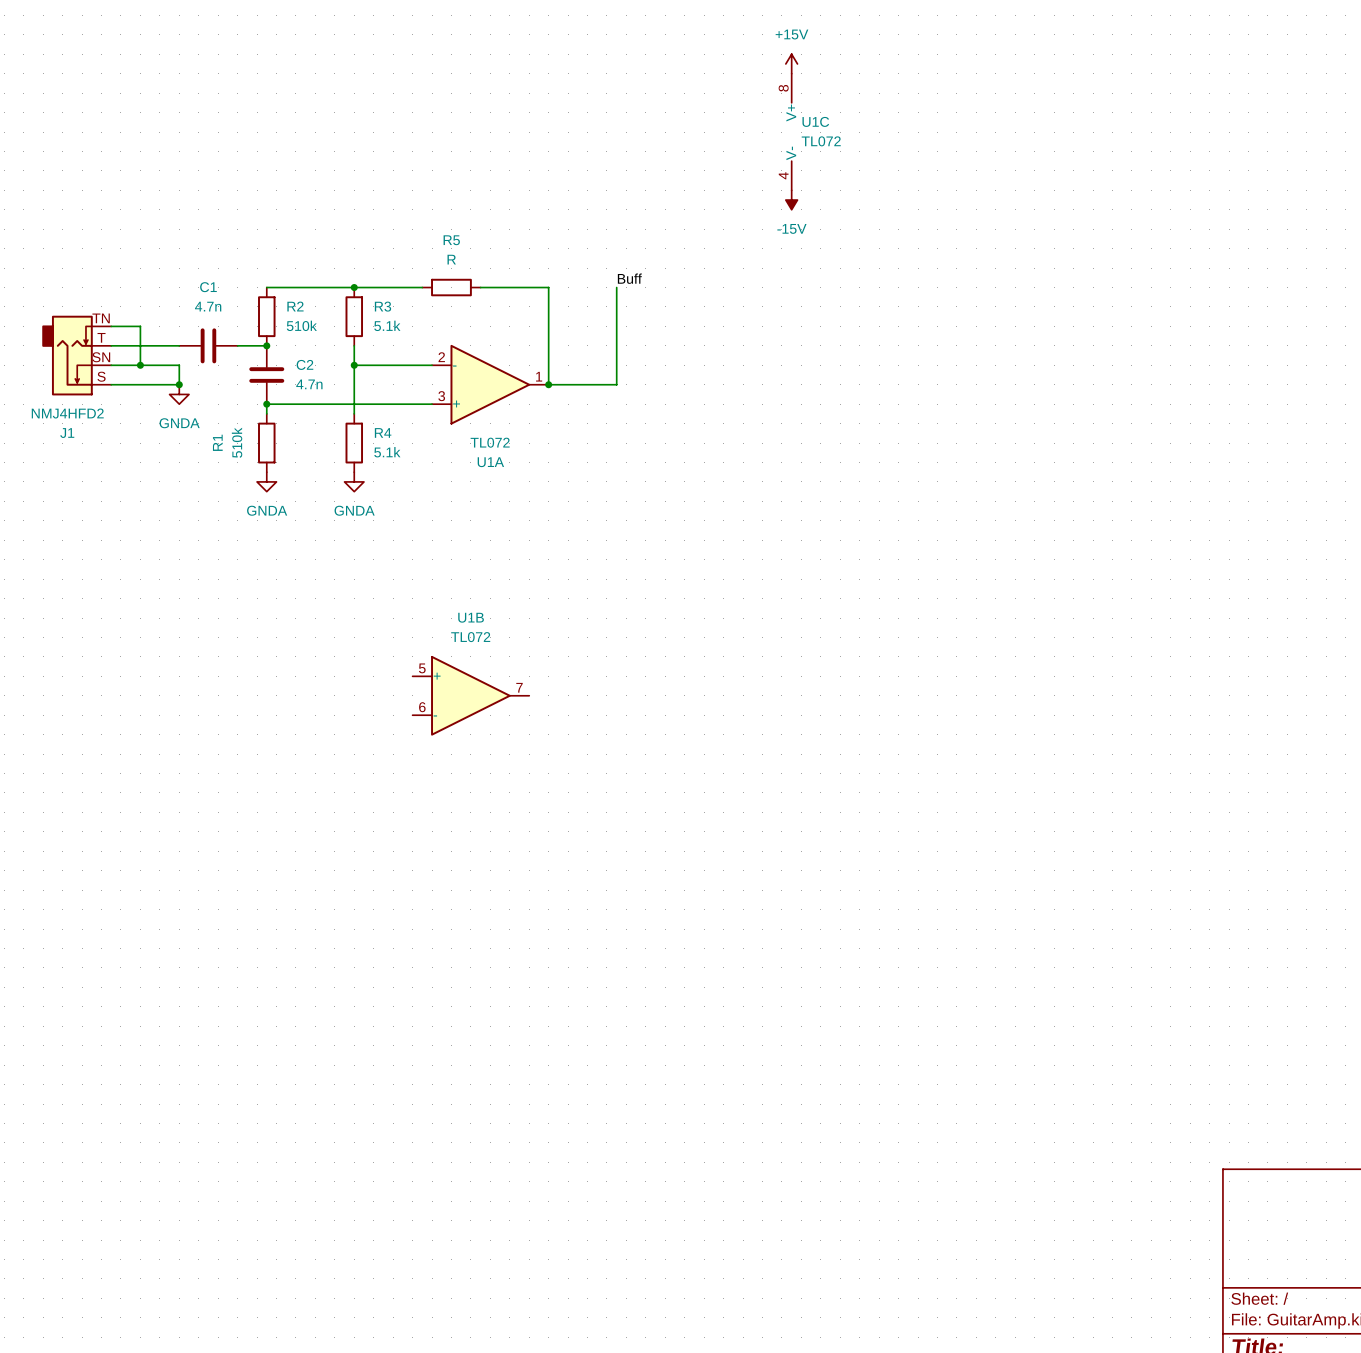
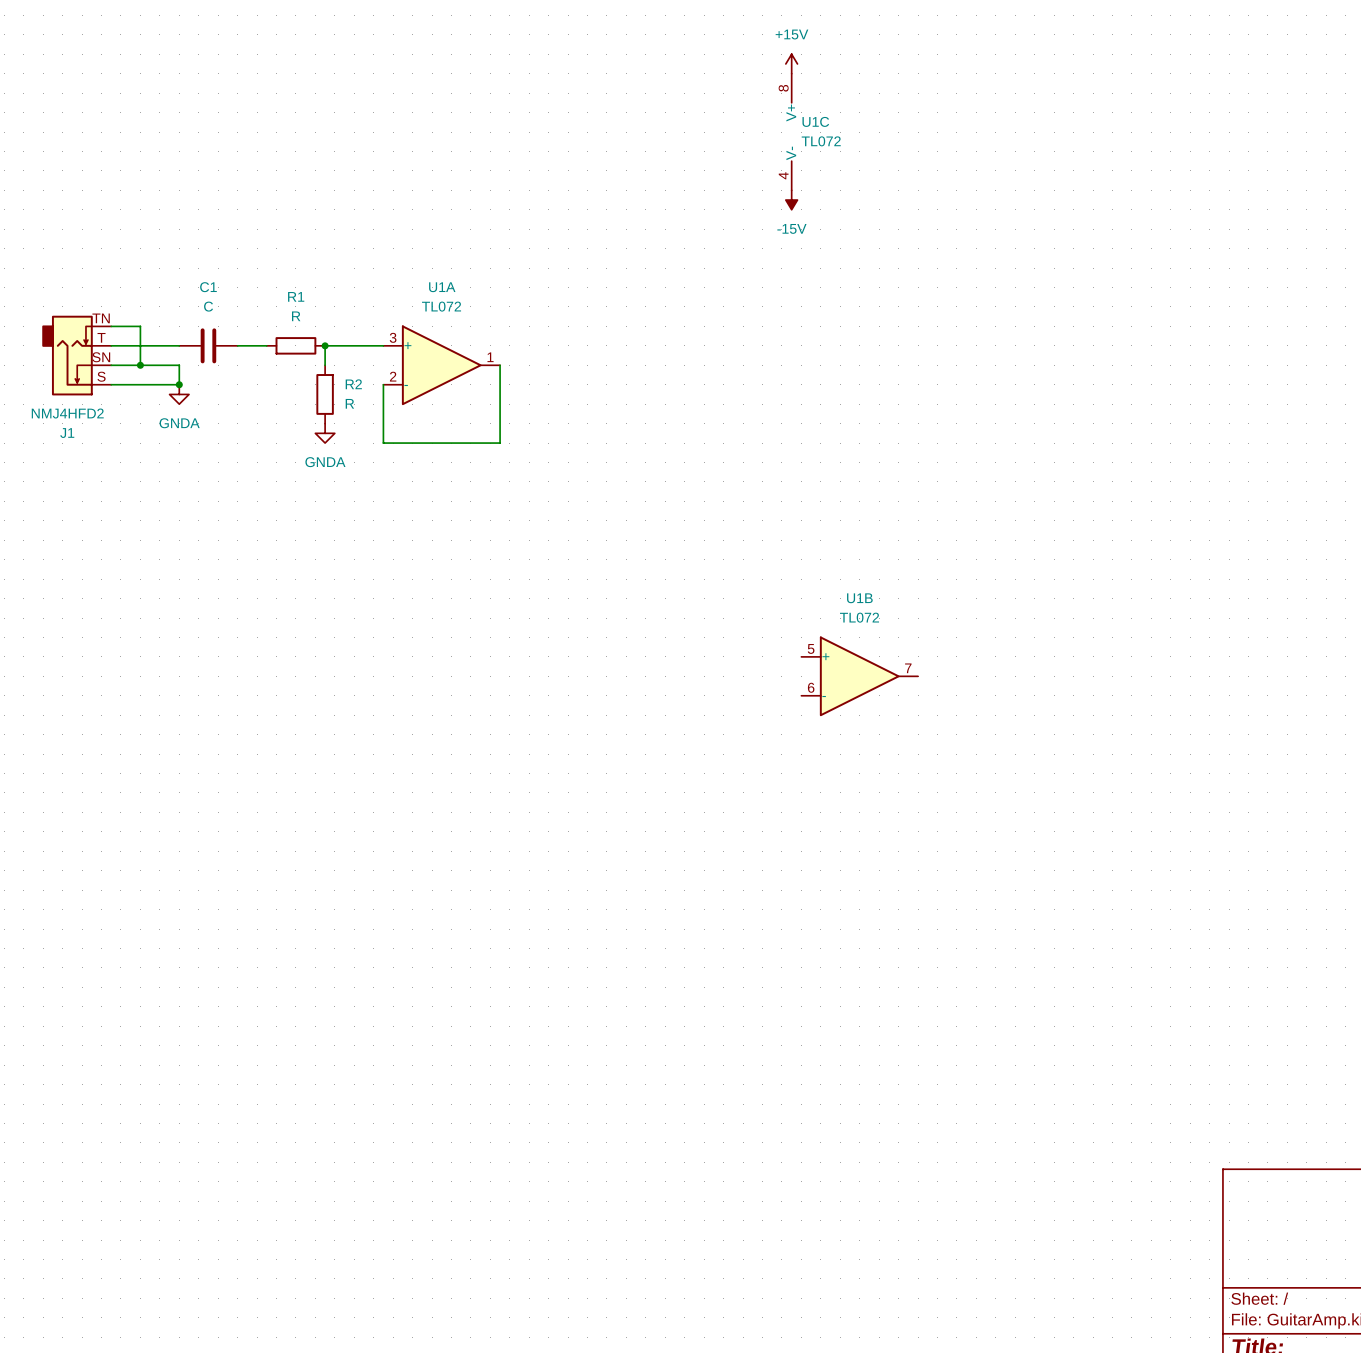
label: Buff (629, 278) -> none
wire: (266, 287) (422, 287) -> none
junction: (354, 287) -> none
R5: R (451, 287) -> none
wire: (480, 287) (548, 287) (548, 384) (616, 384) (616, 287) -> none
C1 value: 4.7n (208, 306) -> C (208, 306)
R2 position: (266, 316) -> (325, 394)
R3: 5.1k (354, 316) -> none
R2 value: 510k (301, 325) -> R (349, 403)
junction: (266, 345) -> none
junction: none -> (325, 345)
wire: (354, 345) (354, 413) -> none
wire: none -> (383, 345) (325, 345) (325, 365)
wire: (354, 365) (432, 365) -> none
junction: (354, 365) -> none
wire: none -> (500, 365) (500, 443) (383, 443) (383, 384)
C2: 4.7n (266, 375) -> none
U1A flip: as is (490, 384) -> up-down (441, 365)
junction: (548, 384) -> none
junction: (266, 404) -> none
wire: (432, 404) (266, 404) (266, 413) -> none
power symbol: none -> GNDA (325, 433)
R1 value: 510k (237, 442) -> R (296, 316)
R1 rotation: 0° (266, 443) -> 90° clockwise (295, 345)
R1 position: (266, 443) -> (295, 345)
R4: 5.1k (354, 443) -> none
power symbol: GNDA (266, 481) -> none
power symbol: GNDA (354, 481) -> none
U1B position: (470, 695) -> (859, 676)

